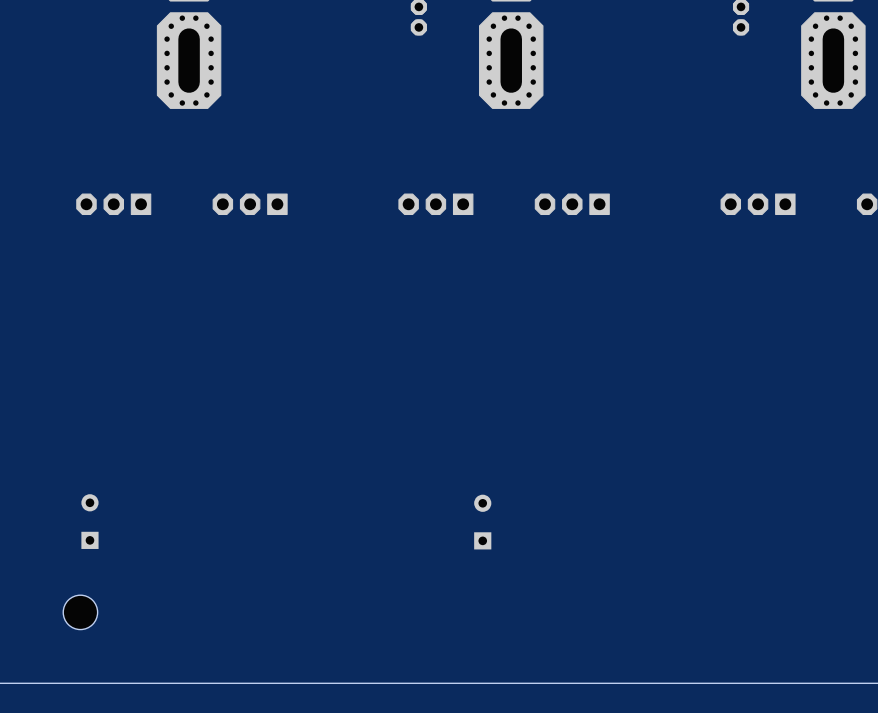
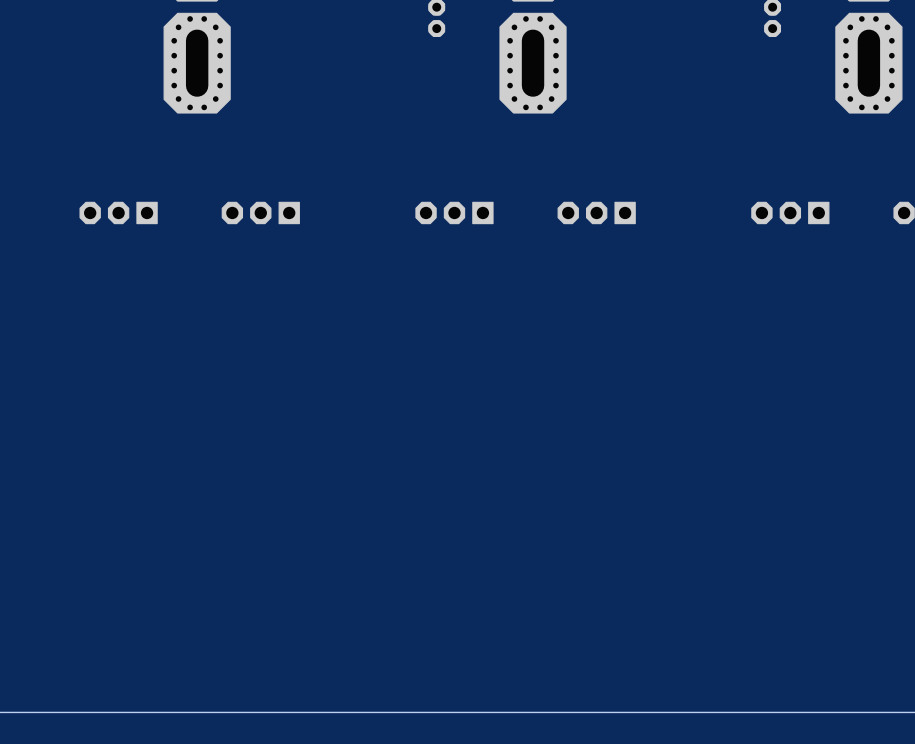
part: (89, 521) -> none
part: (482, 522) -> none
part: (80, 612) -> none

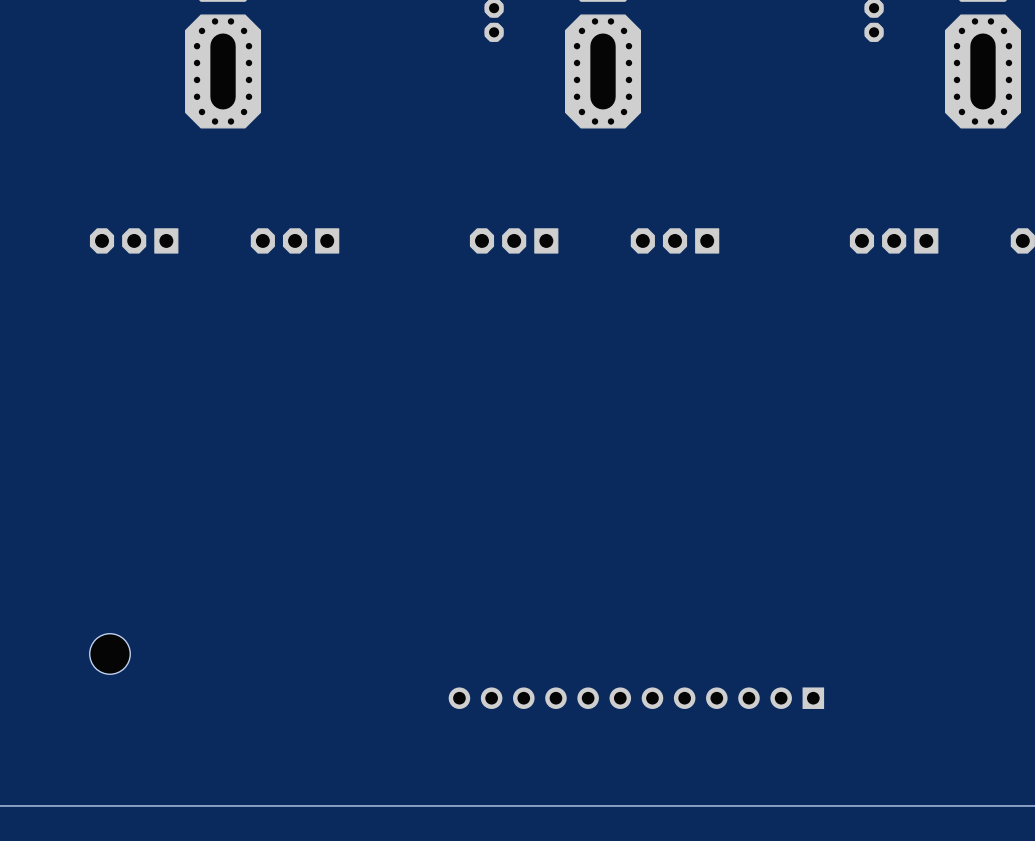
part: none -> (109, 653)
part: none -> (636, 698)

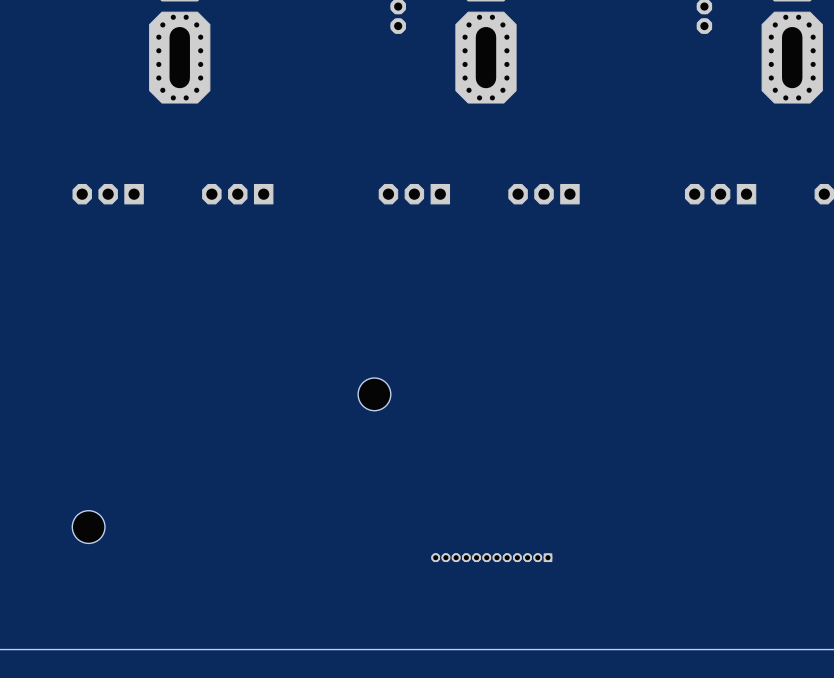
part: none -> (374, 394)
part: none -> (491, 557)
part: (636, 698) -> none

